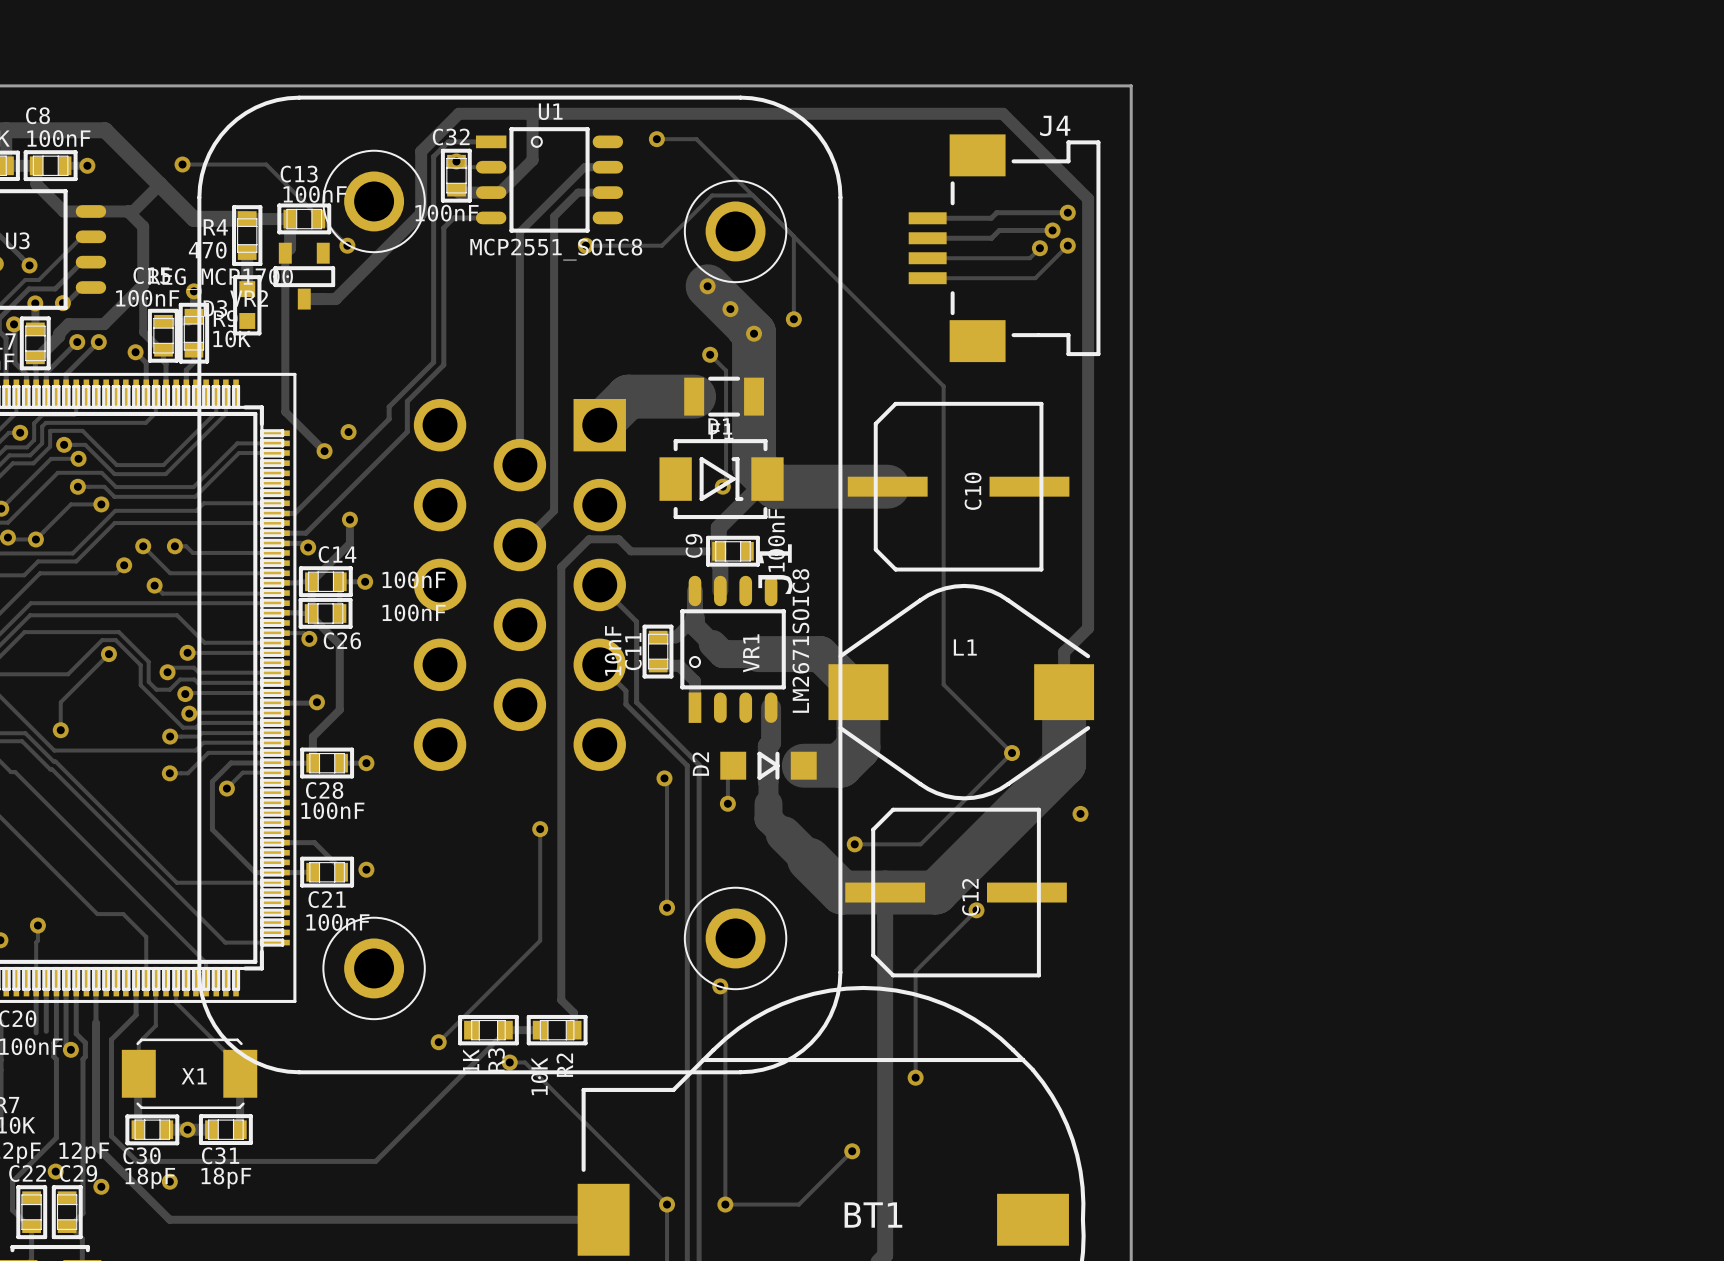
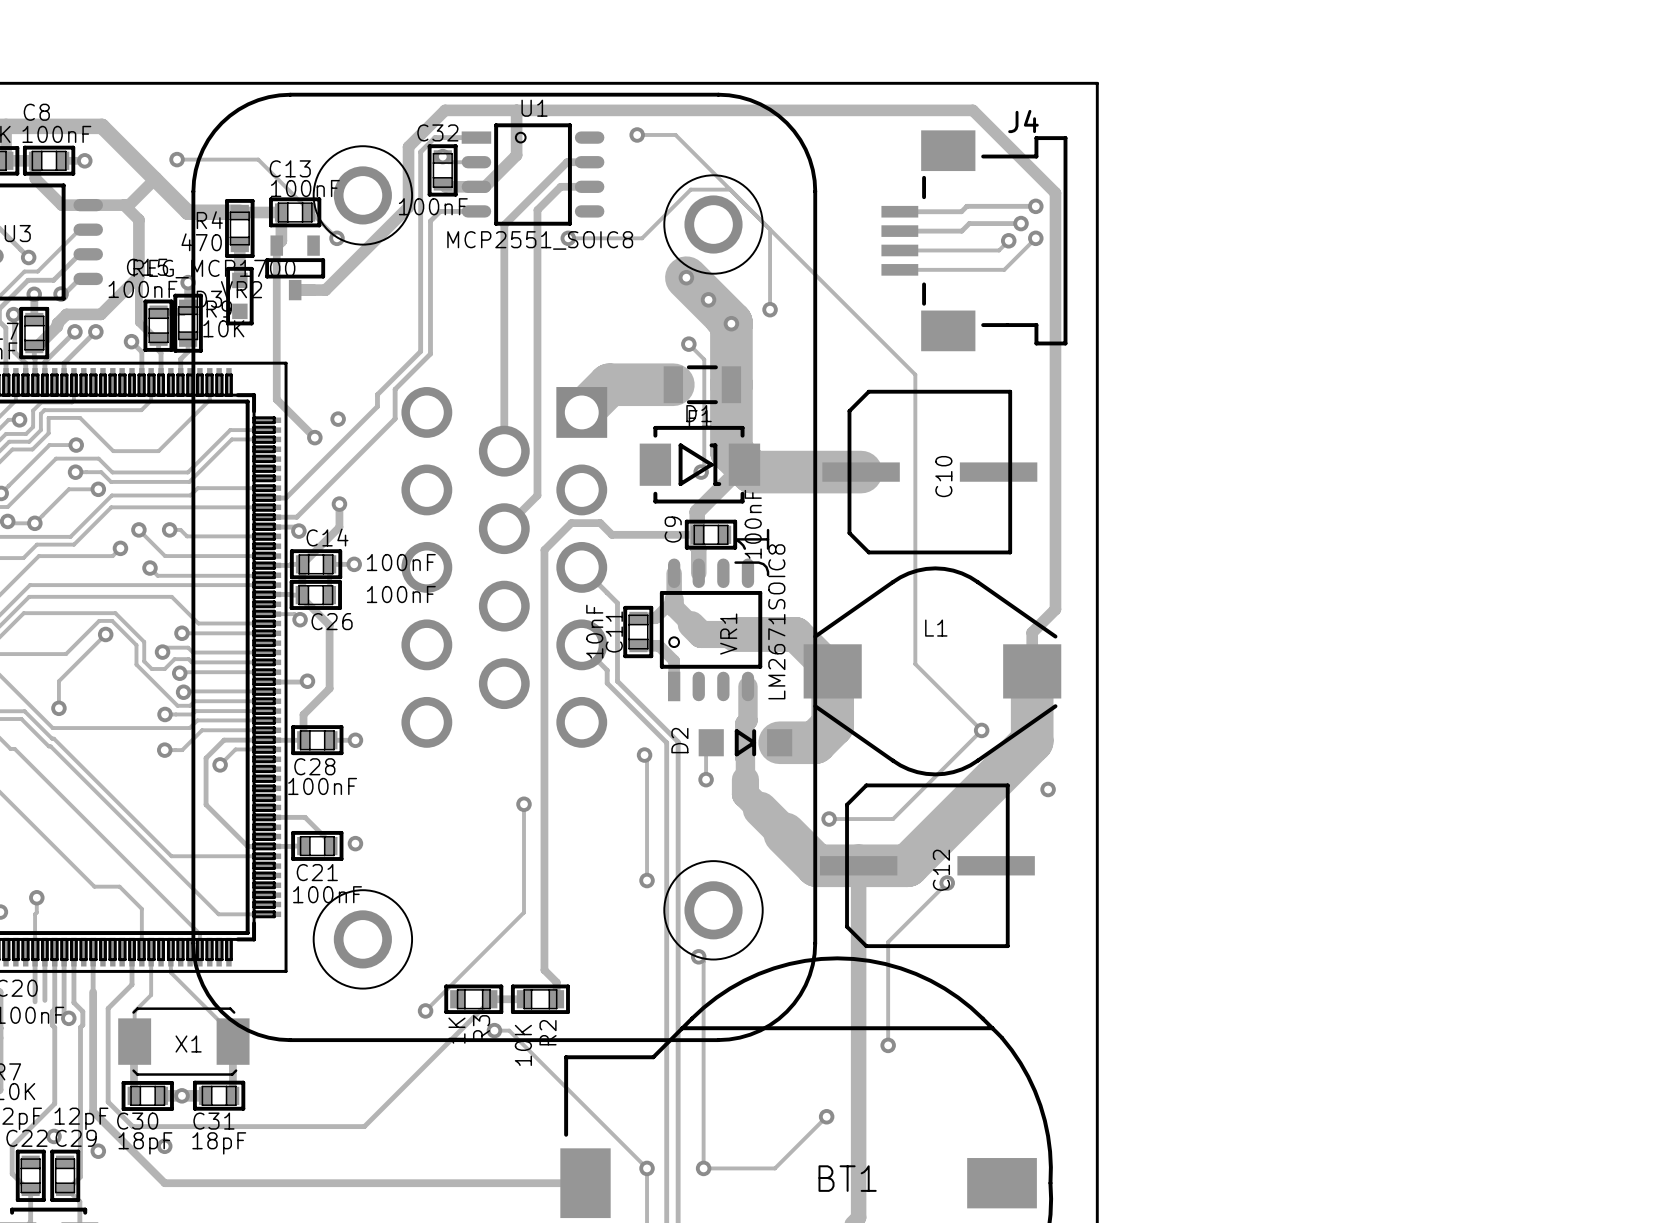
track: (225, 394) (225, 413) (165, 474) (114, 474) (85, 444) (64, 444) -> none
via: (64, 444) -> none

